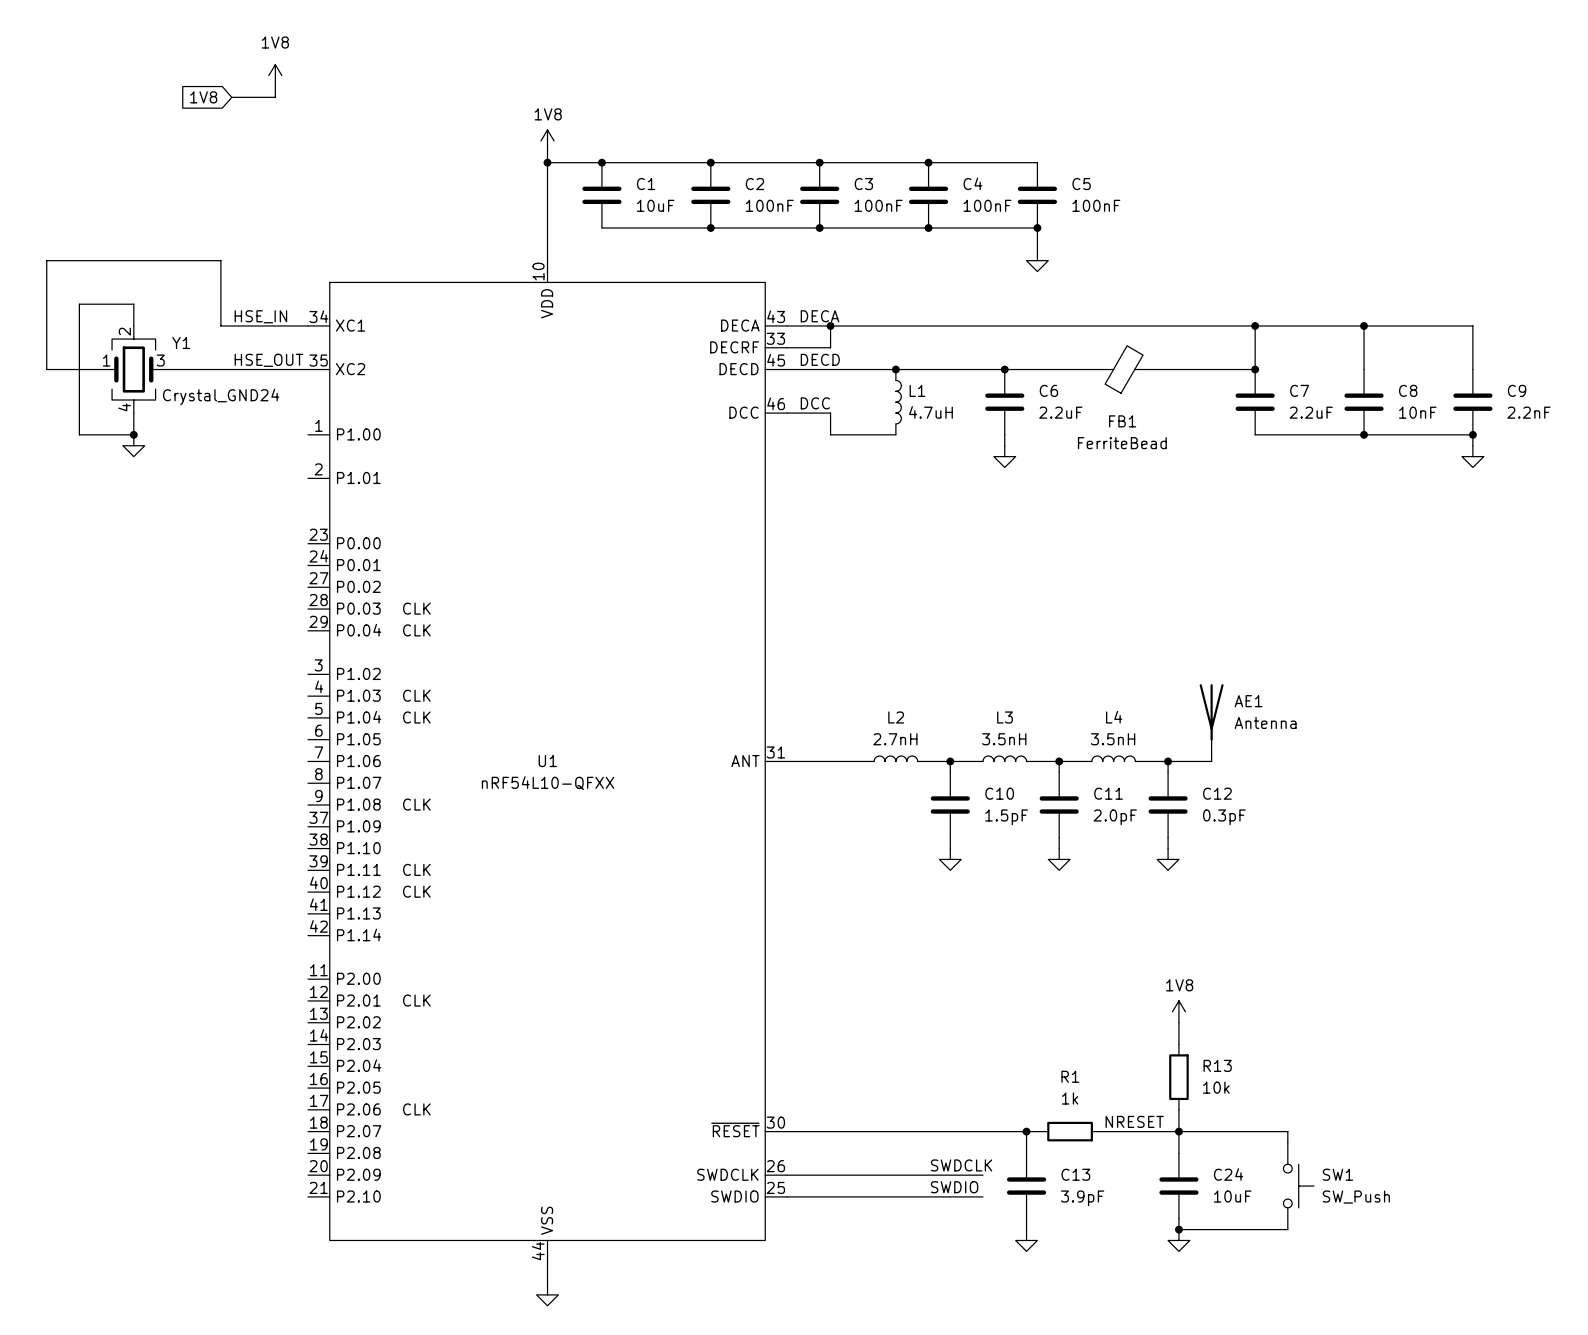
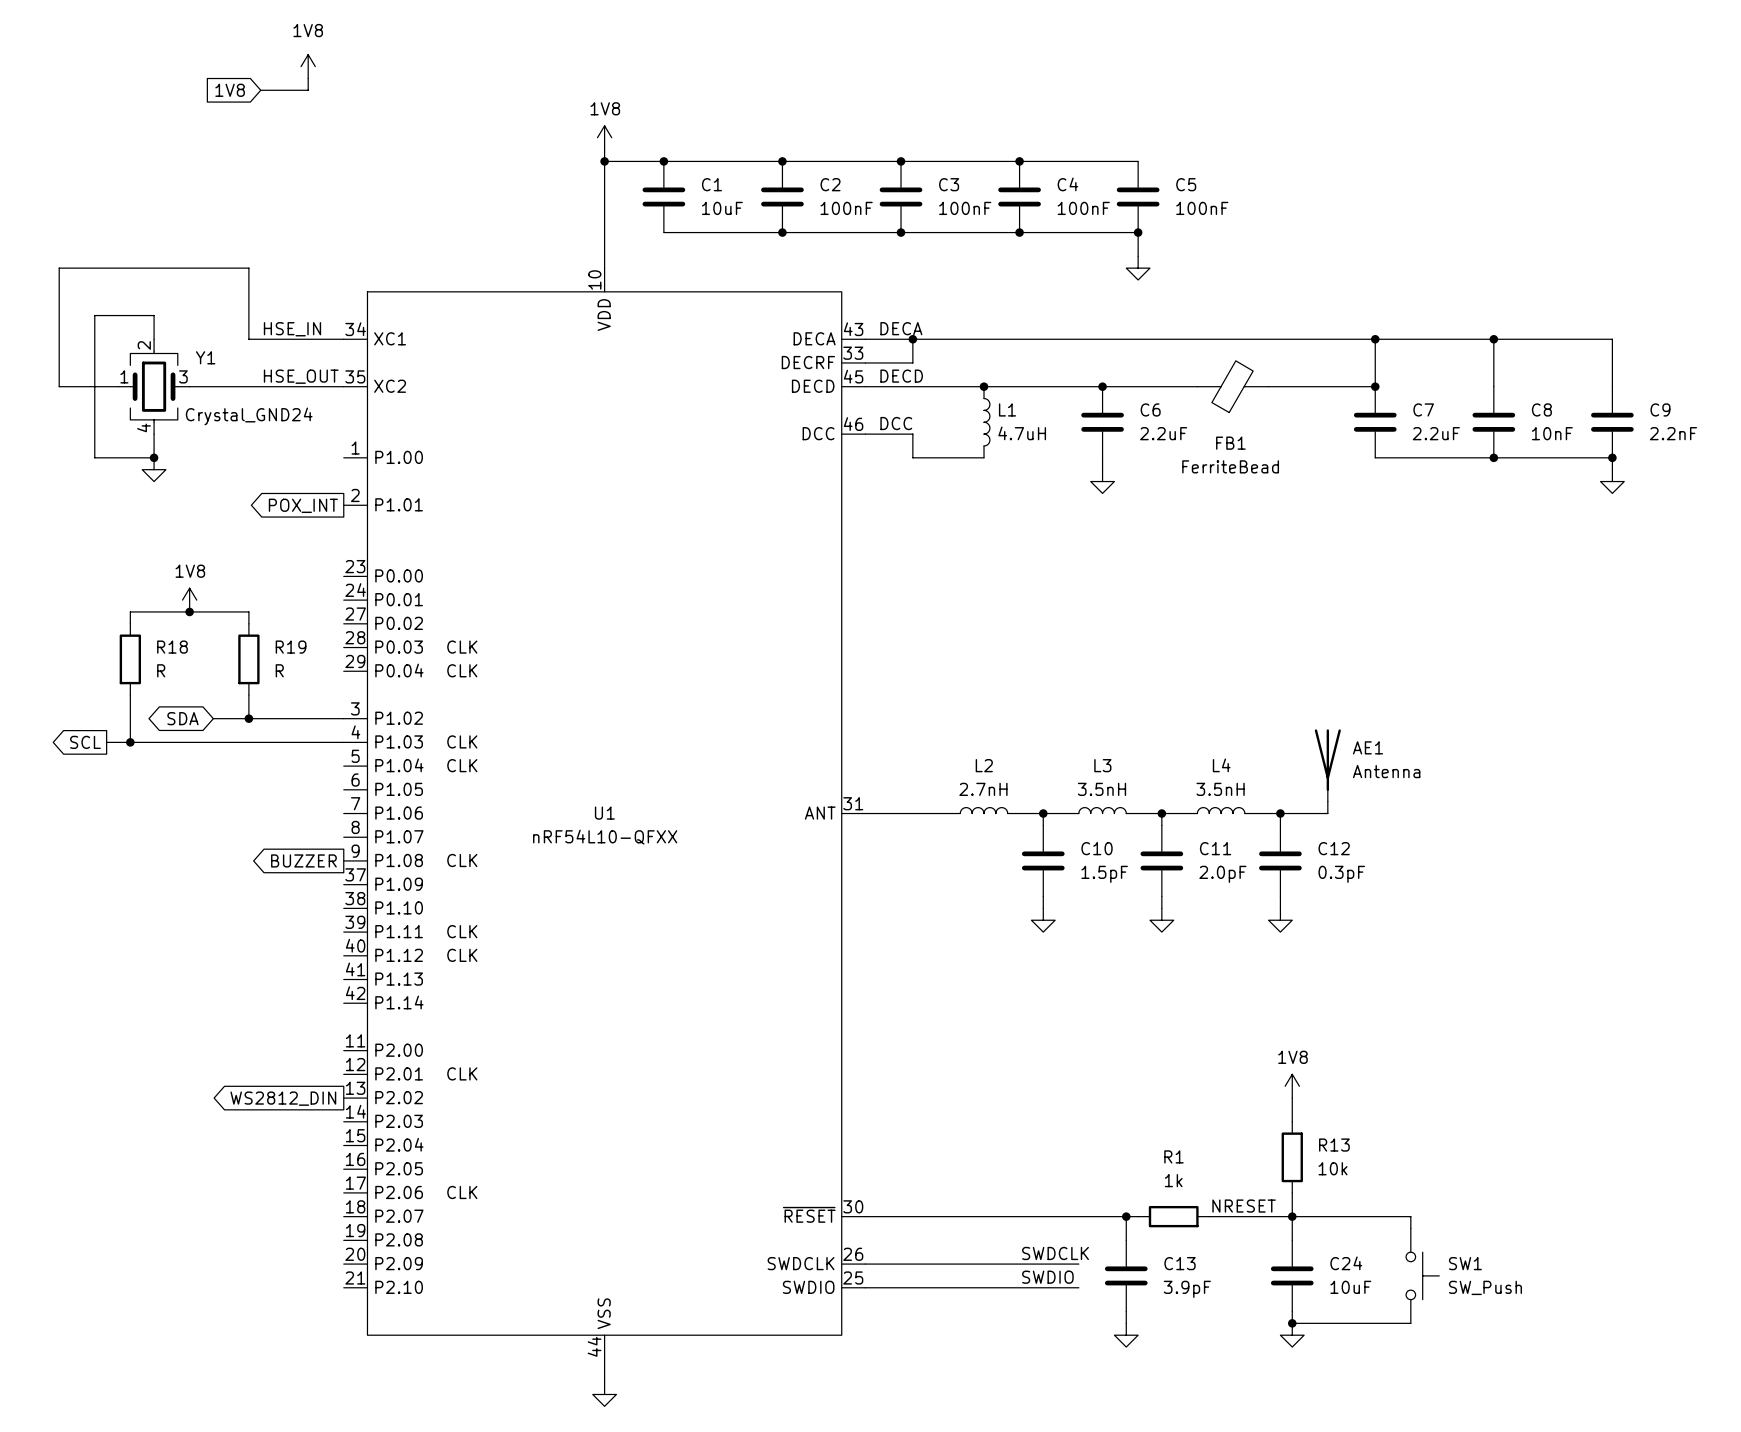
global label: none -> POX_INT (303, 505)
power symbol: none -> 1V8 (189, 600)
junction: none -> (189, 611)
wire: none -> (130, 623) (130, 611) (248, 611) (248, 623)
R18: none -> R (130, 659)
R19: none -> R (248, 659)
wire: none -> (130, 694) (130, 742)
wire: none -> (248, 694) (248, 718)
global label: none -> SDA (182, 718)
wire: none -> (213, 718) (343, 718)
junction: none -> (248, 718)
global label: none -> SCL (85, 742)
wire: none -> (106, 742) (343, 742)
junction: none -> (130, 742)
global label: none -> BUZZER (303, 860)
global label: none -> WS2812_DIN (283, 1098)

